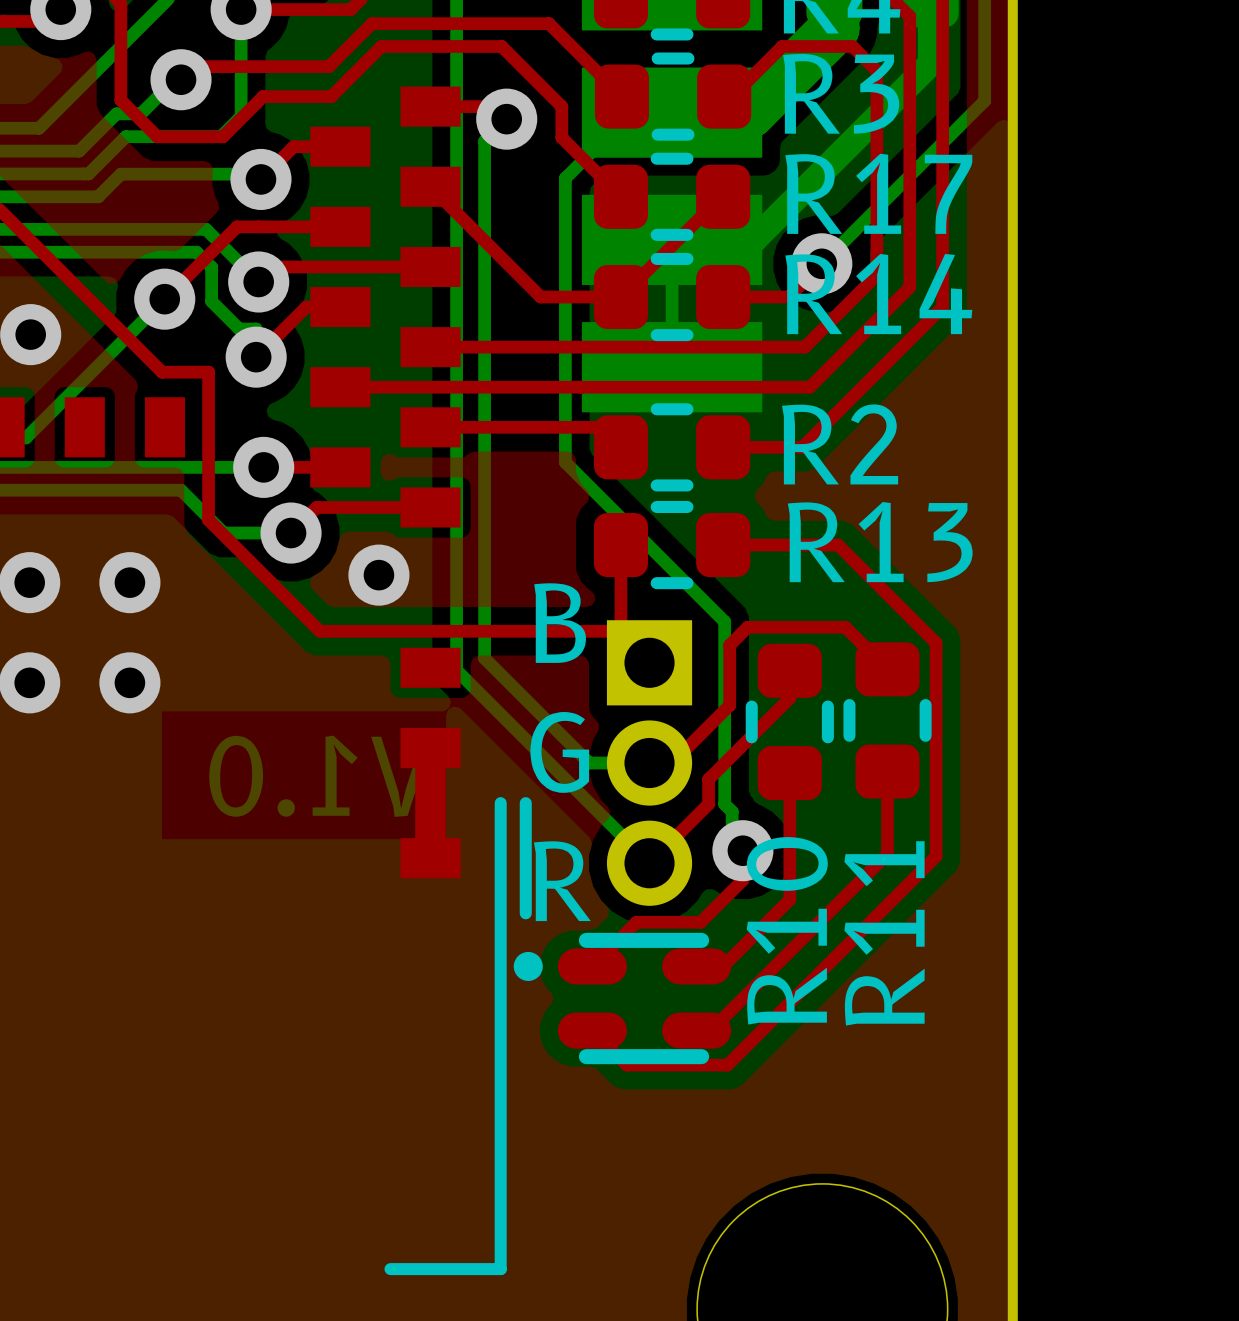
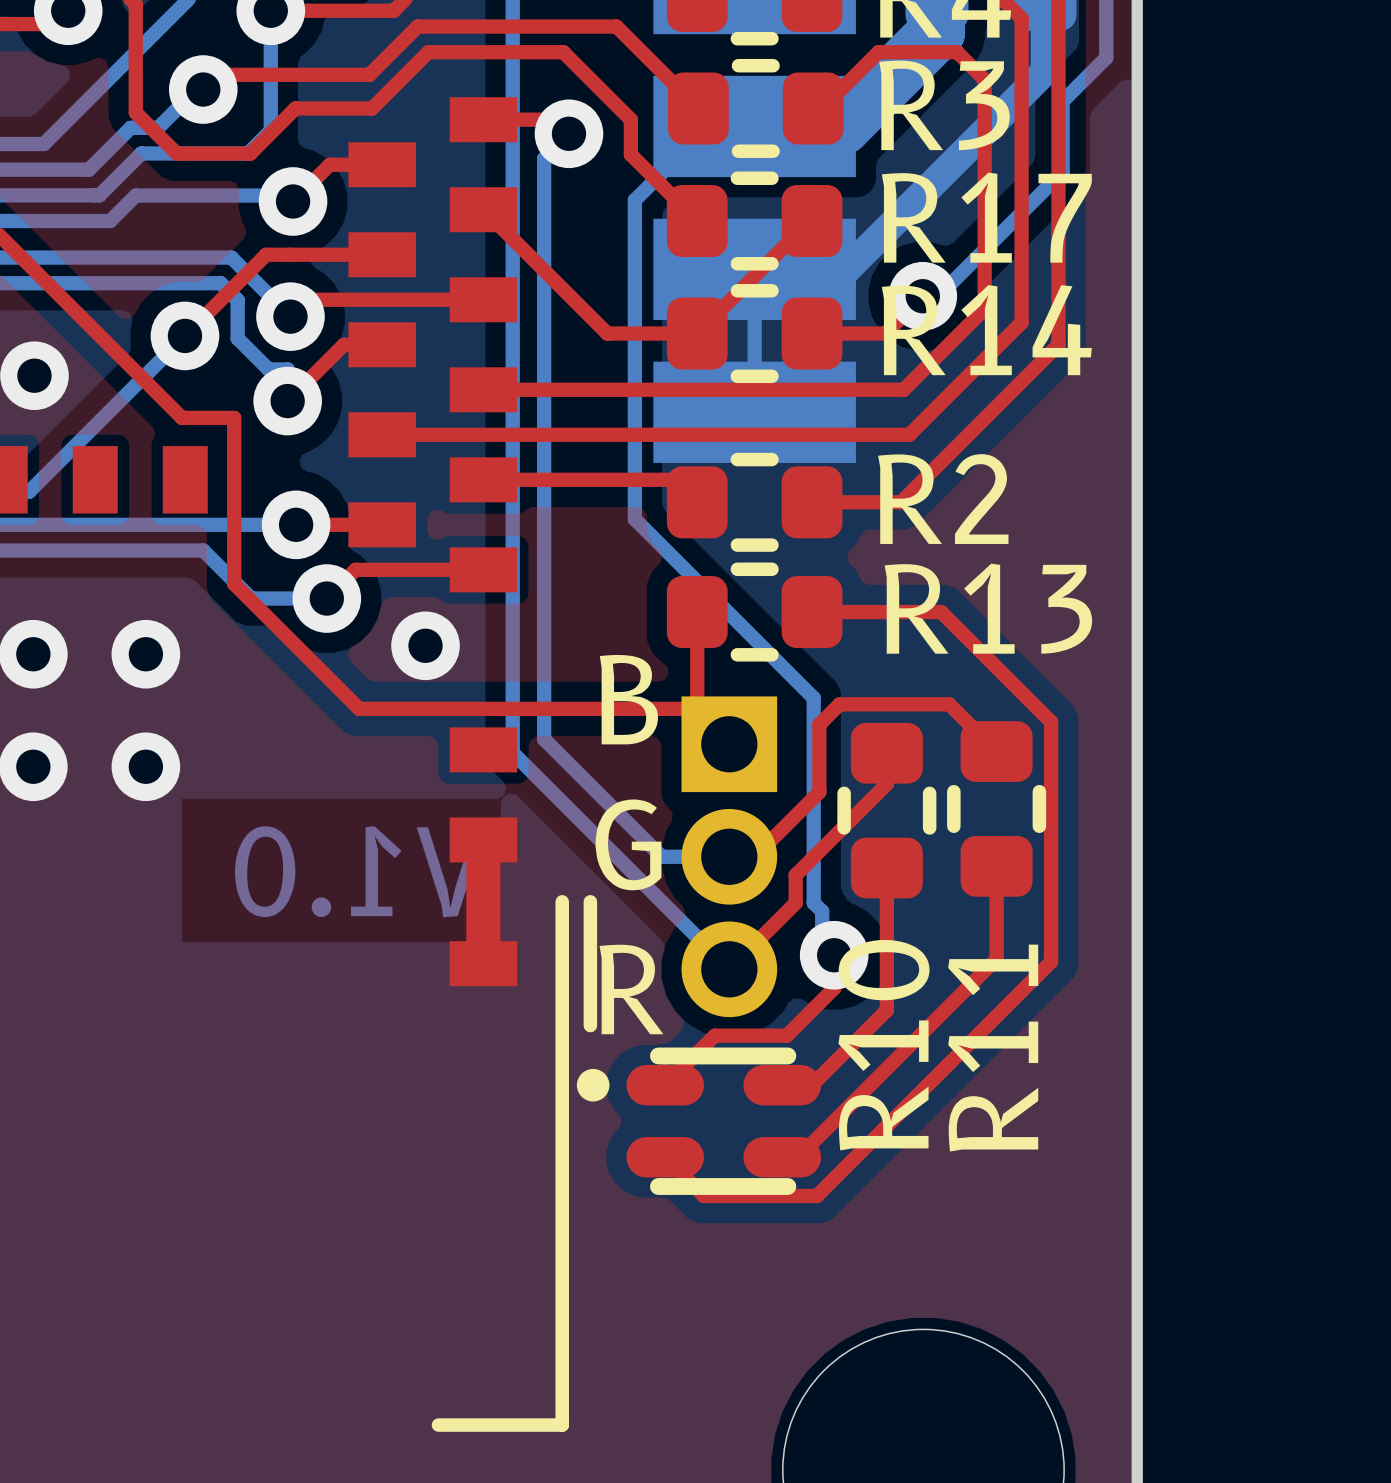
bottom track: (985, 51) (984, 100) (821, 263) -> (1106, 57) (1062, 101) (1062, 171) (938, 296)

